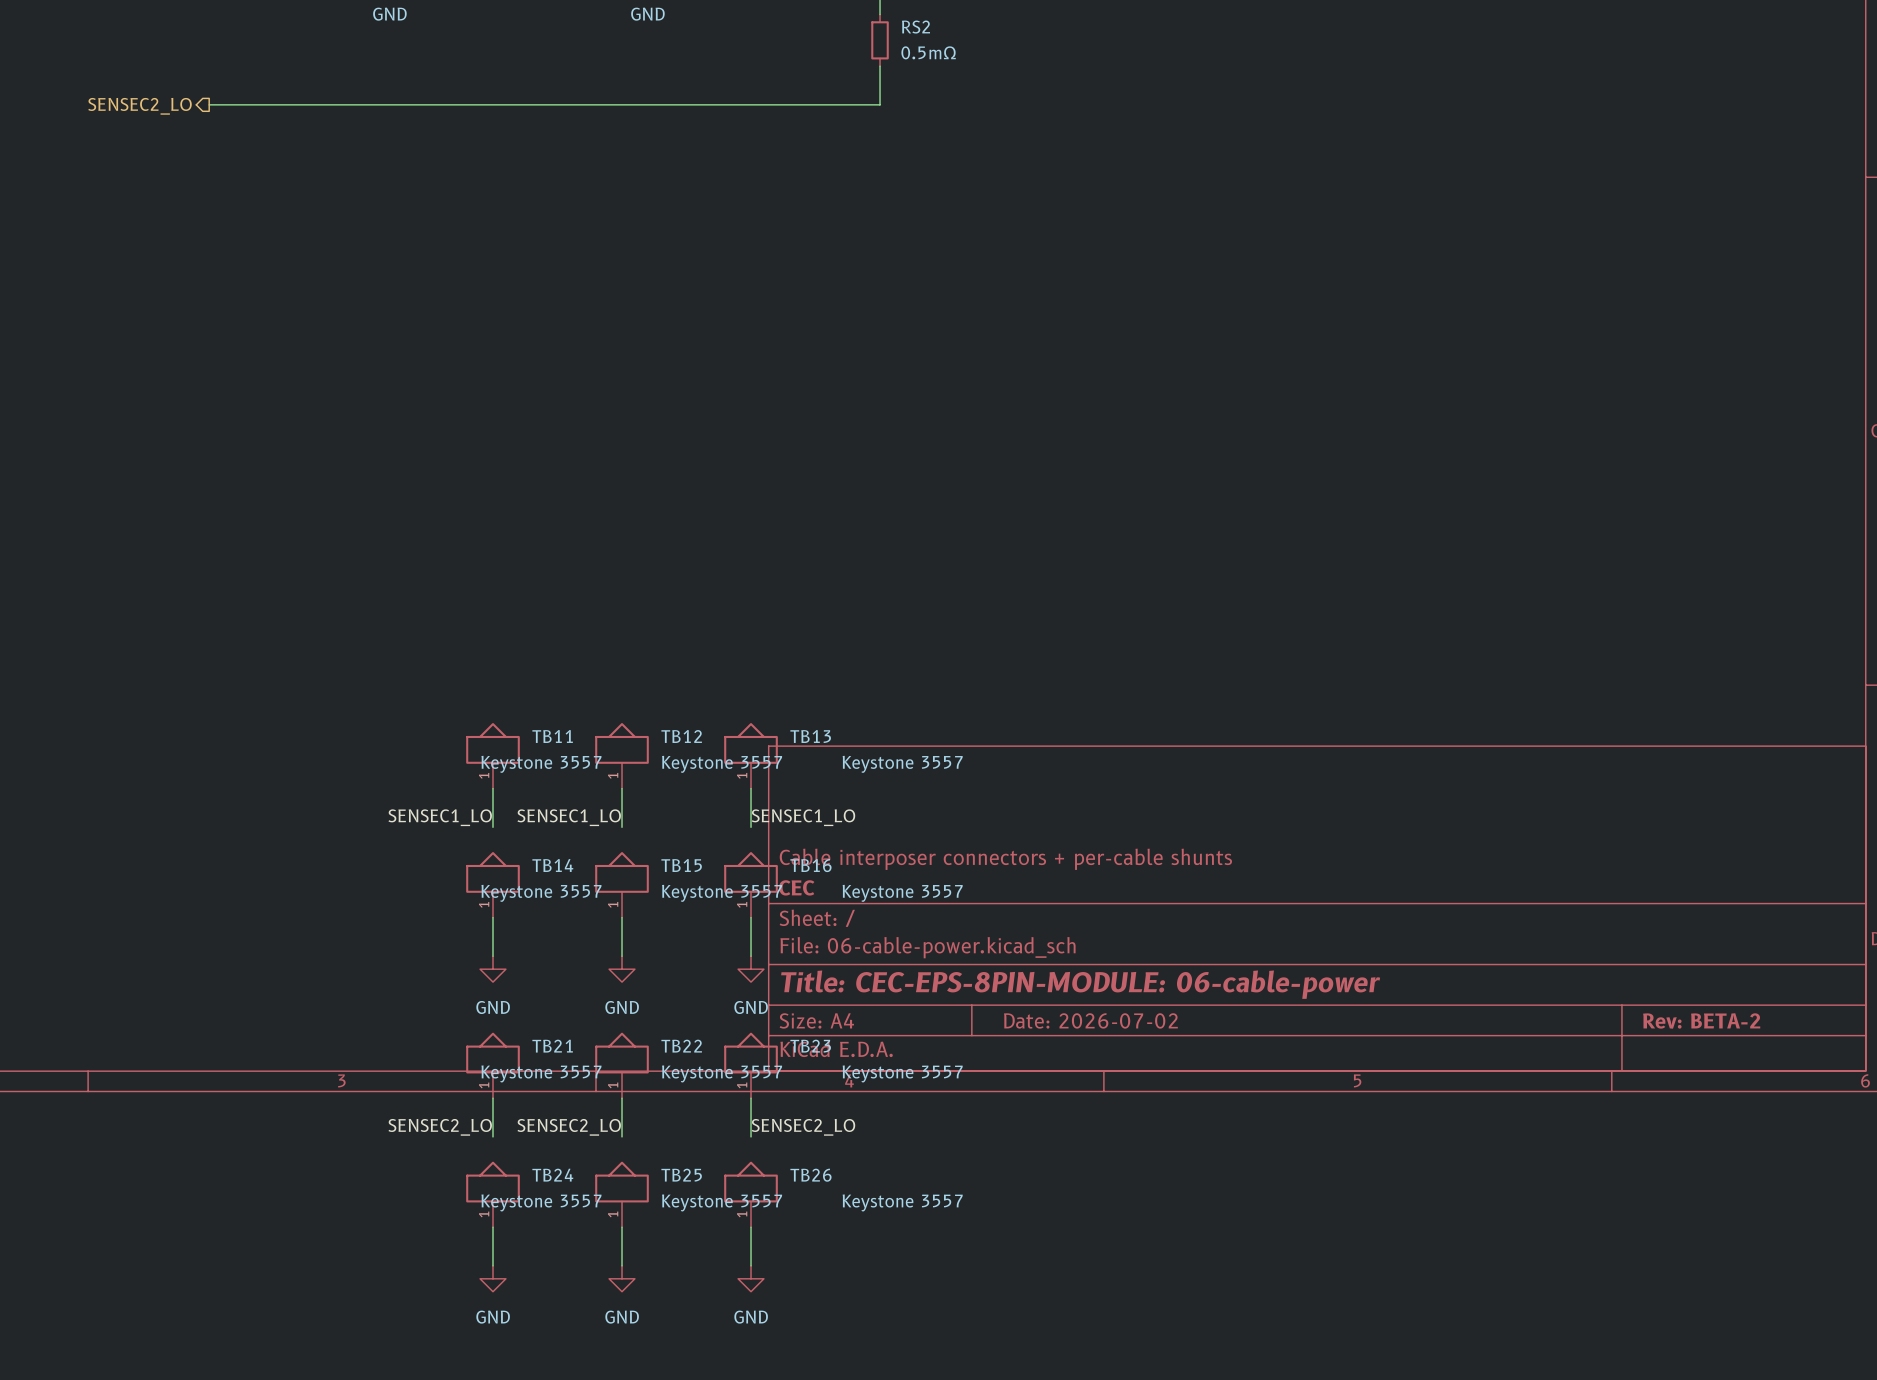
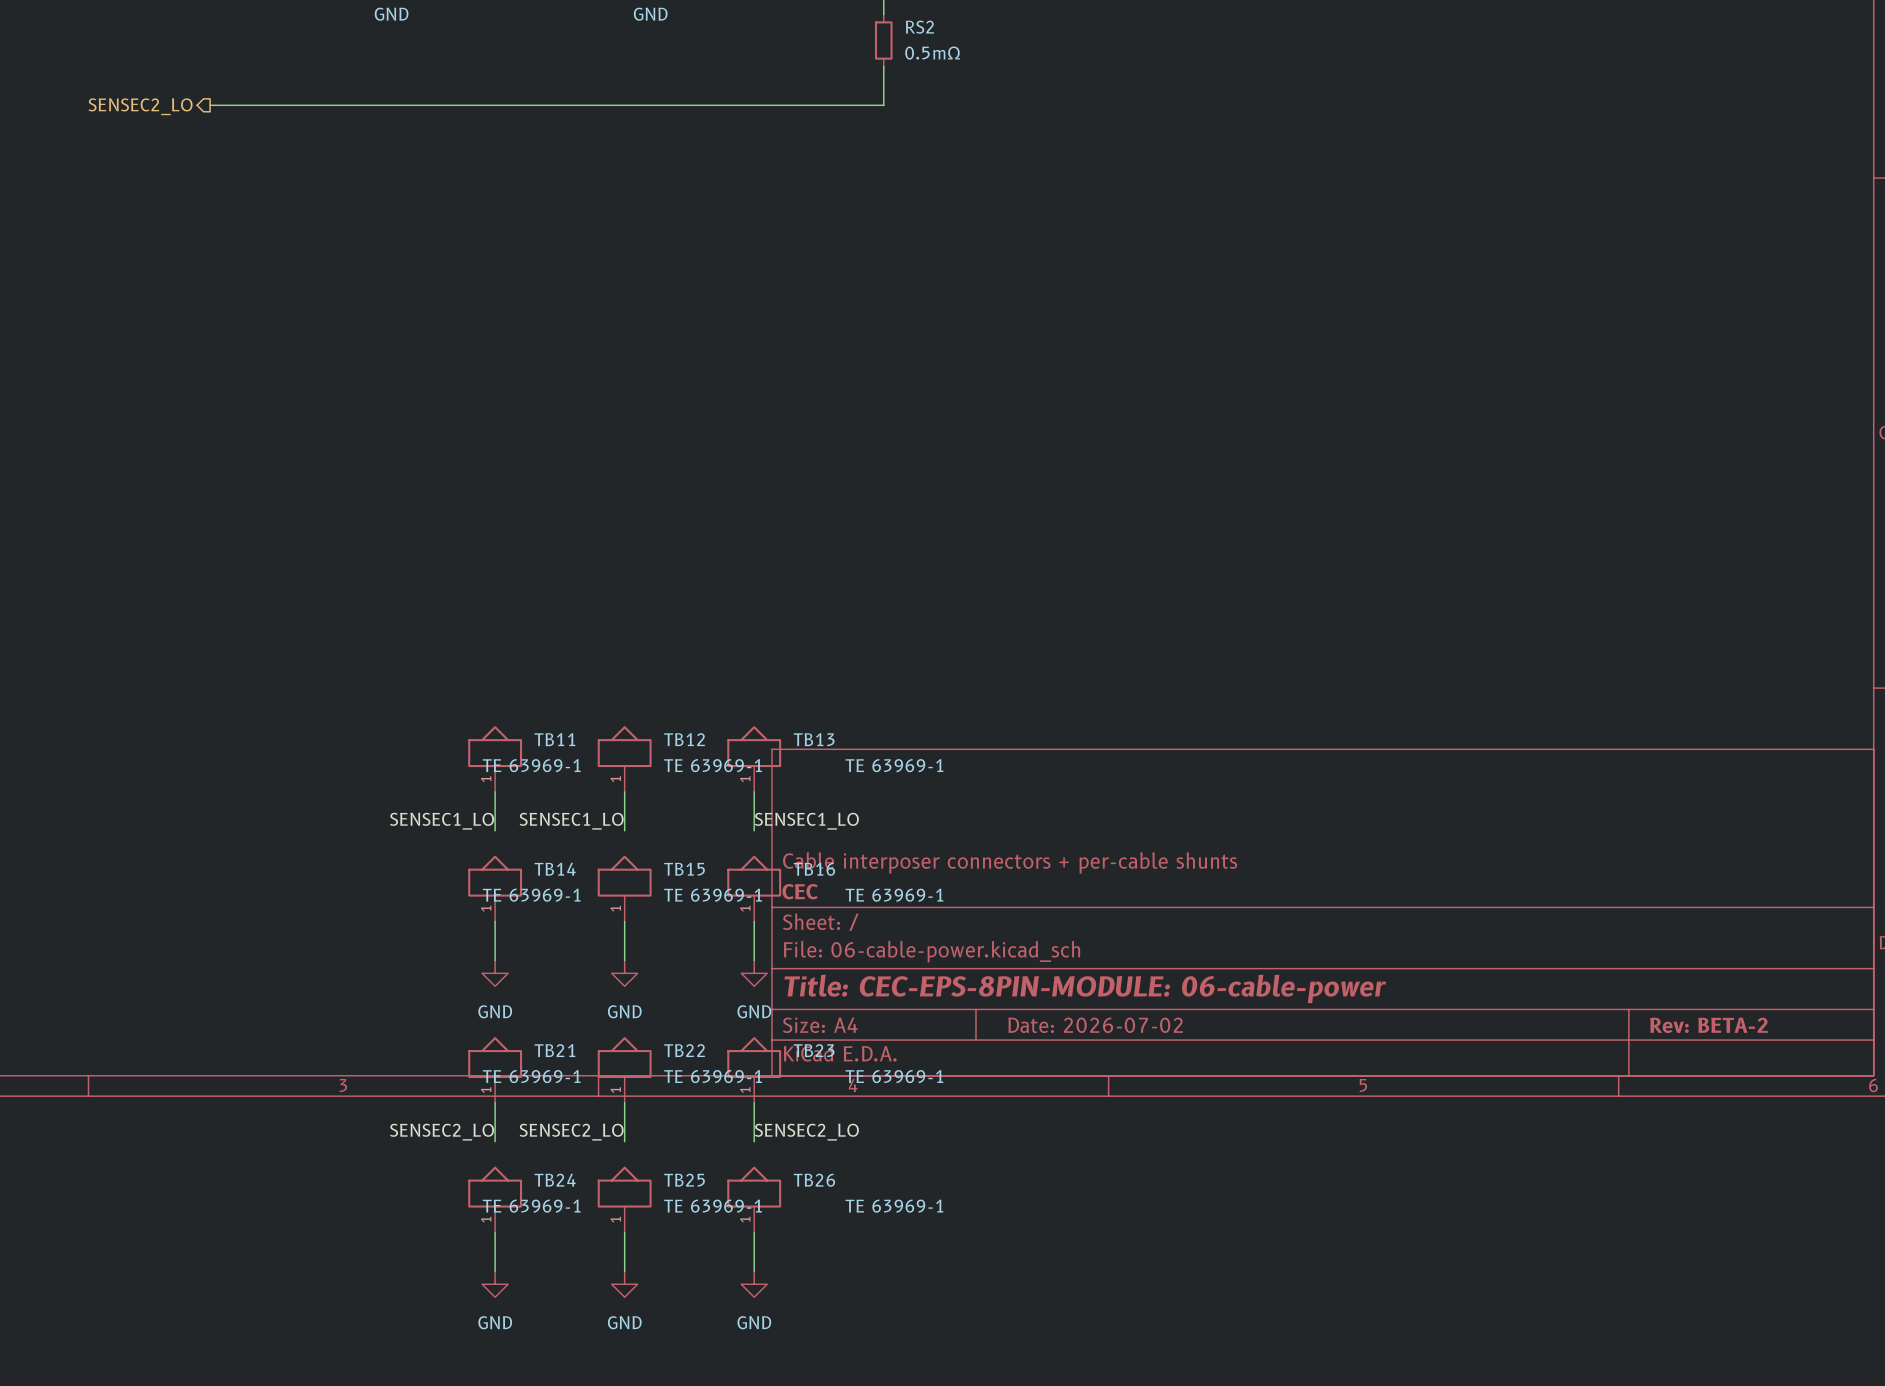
TB11 value: Keystone 3557 (541, 764) -> TE 63969-1 (531, 765)
TB12 value: Keystone 3557 (722, 764) -> TE 63969-1 (713, 765)
TB13 value: Keystone 3557 (902, 764) -> TE 63969-1 (894, 765)
TB14 value: Keystone 3557 (541, 893) -> TE 63969-1 (531, 895)
TB15 value: Keystone 3557 (722, 893) -> TE 63969-1 (713, 895)
TB16 value: Keystone 3557 (902, 893) -> TE 63969-1 (894, 895)
TB21 value: Keystone 3557 (541, 1073) -> TE 63969-1 (531, 1076)
TB22 value: Keystone 3557 (722, 1073) -> TE 63969-1 (713, 1076)
TB23 value: Keystone 3557 (902, 1073) -> TE 63969-1 (894, 1076)
TB24 value: Keystone 3557 (541, 1202) -> TE 63969-1 (531, 1206)
TB25 value: Keystone 3557 (722, 1202) -> TE 63969-1 (713, 1206)
TB26 value: Keystone 3557 (902, 1202) -> TE 63969-1 (894, 1206)

